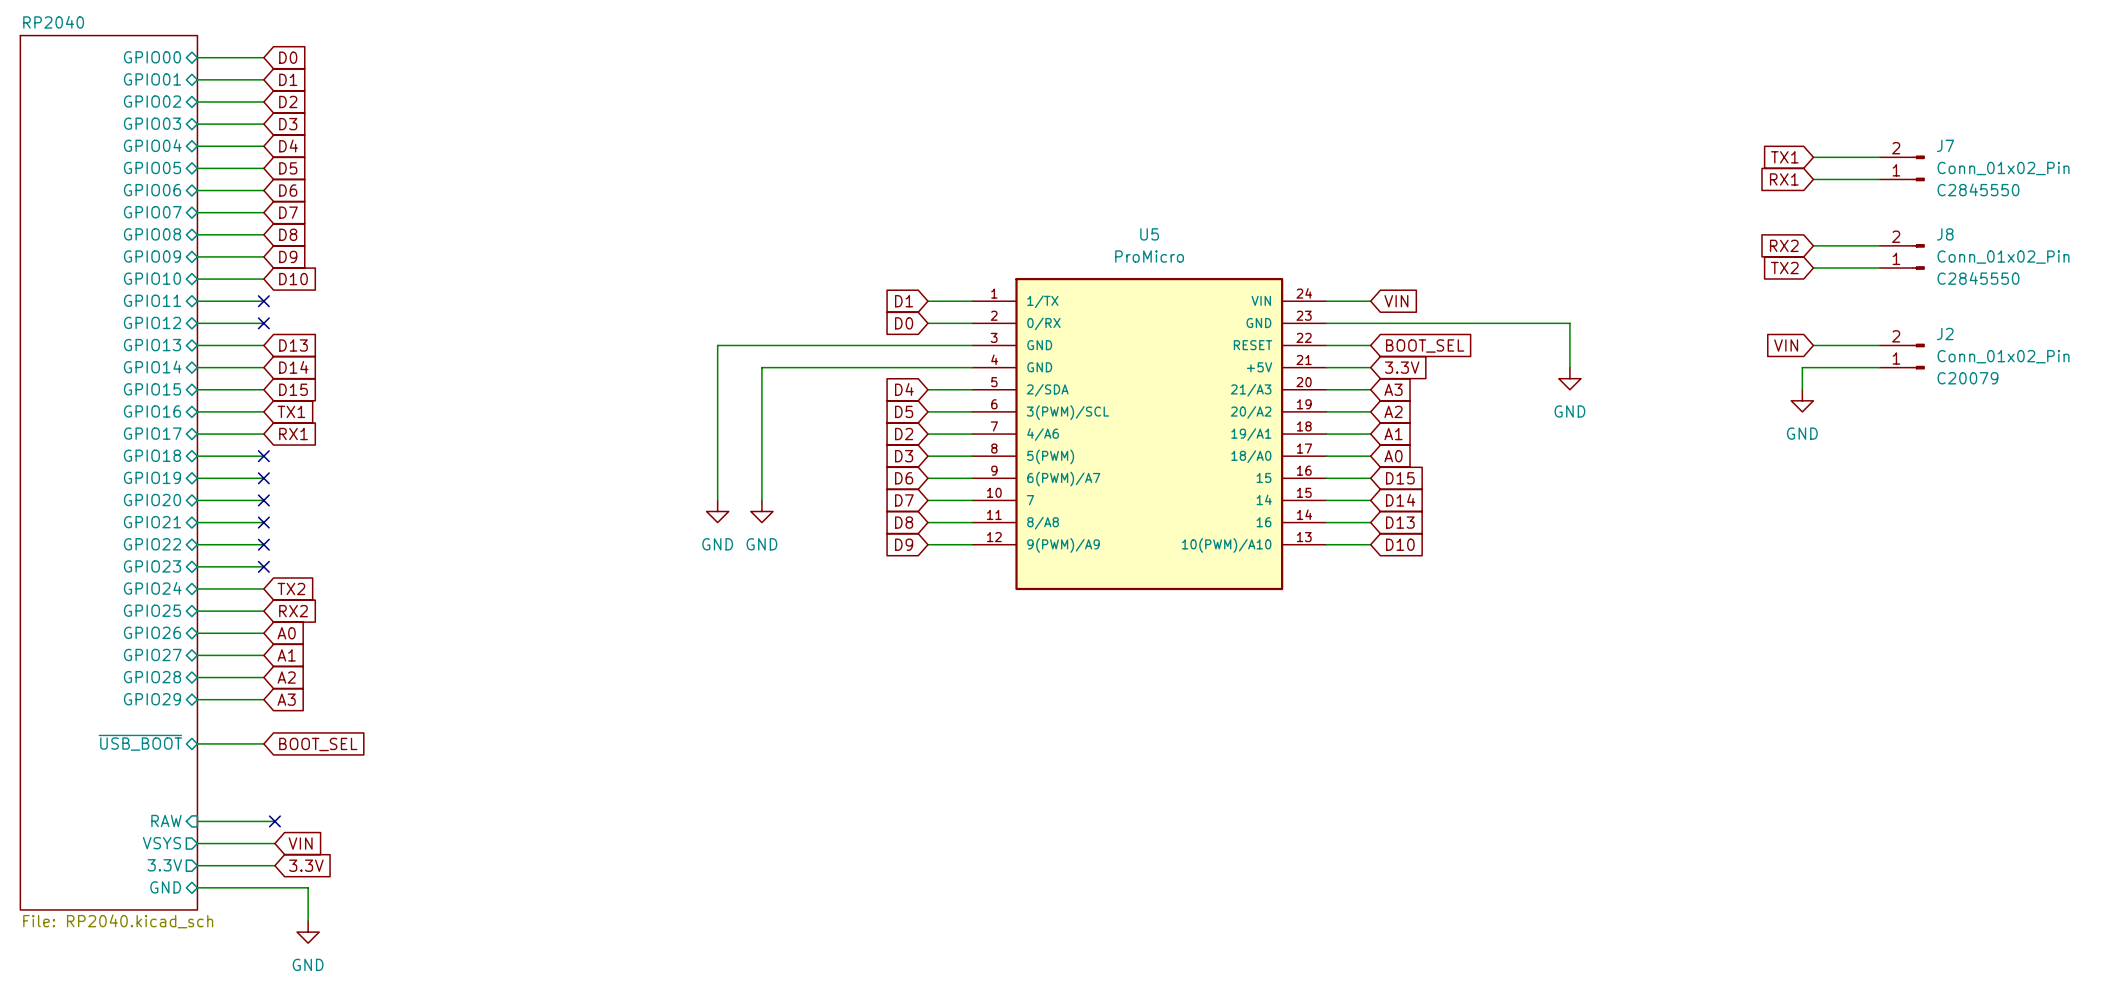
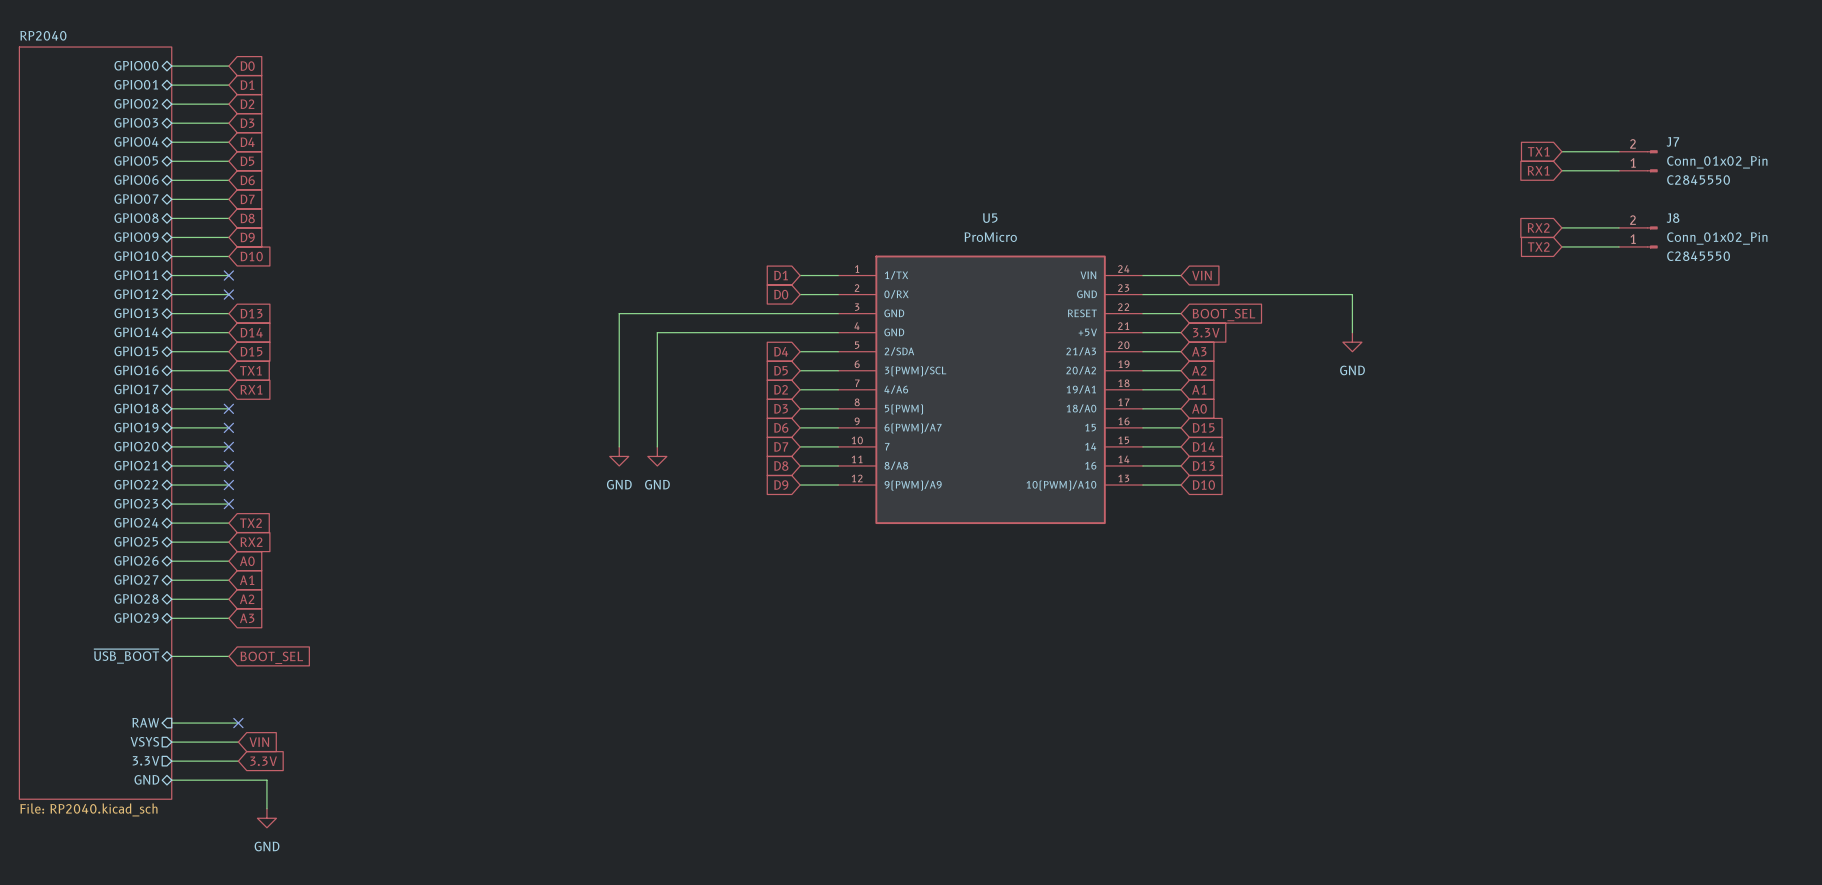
global label: VIN (1786, 345) -> none
wire: (1813, 345) (1879, 345) -> none
J2: Conn_01x02_Pin (1902, 356) -> none
wire: (1879, 367) (1802, 367) (1802, 389) -> none
power symbol: GND (1802, 400) -> none

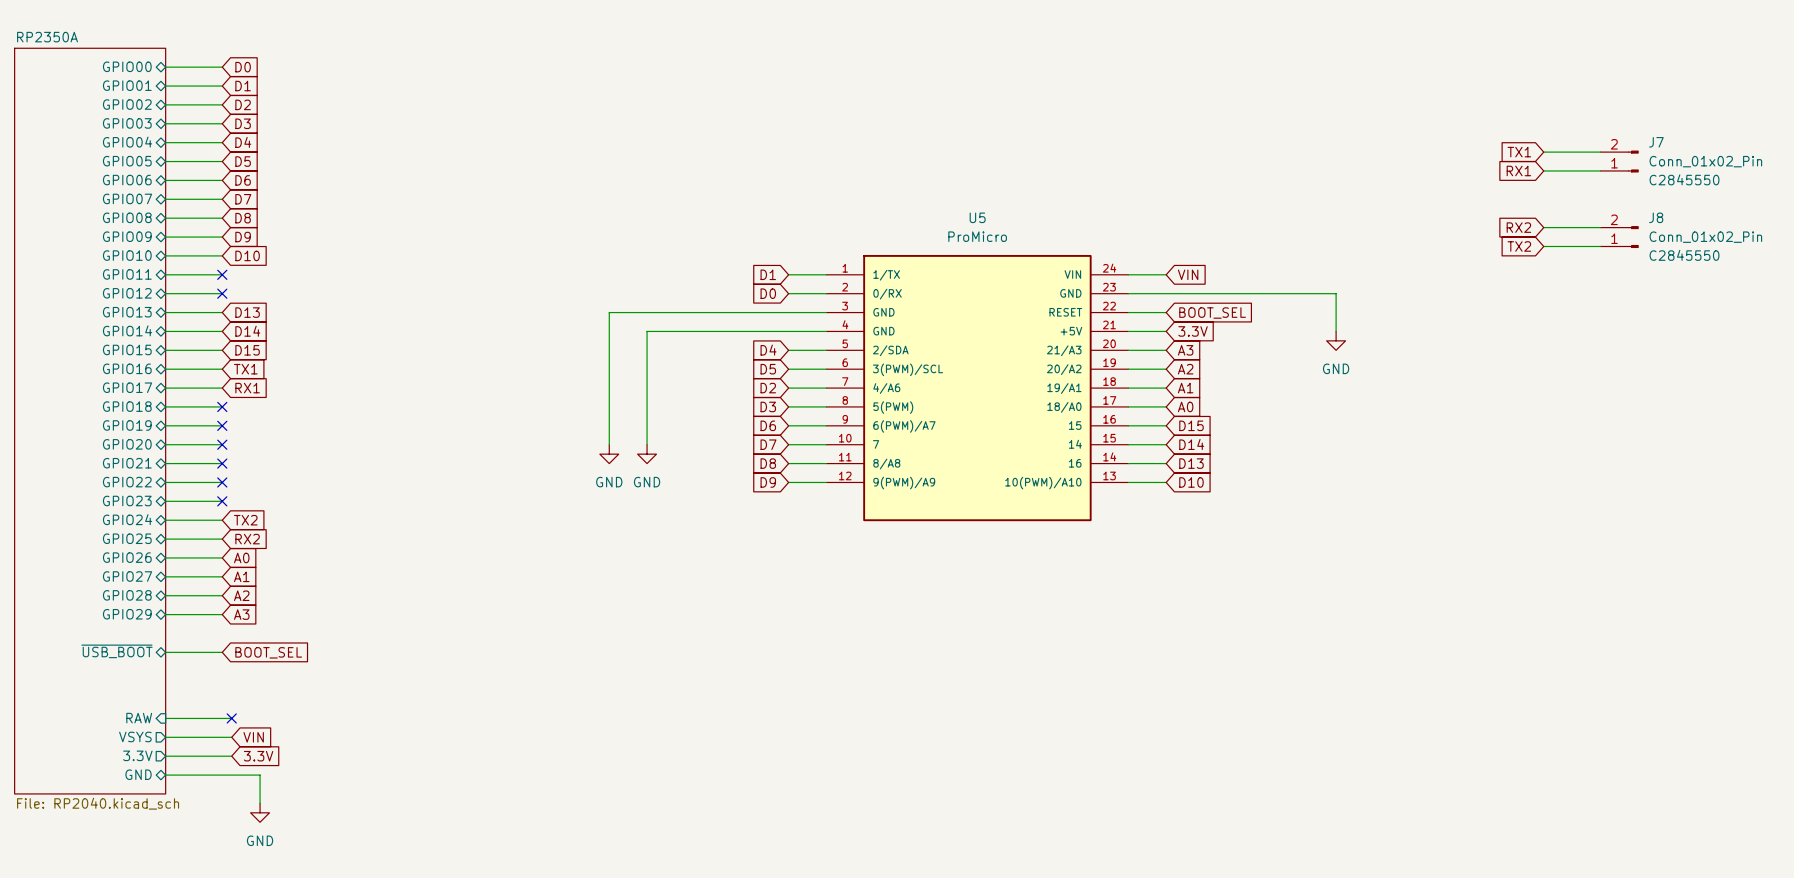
sheet RP2040 name: RP2040 (43, 35) -> RP2350A (47, 37)

